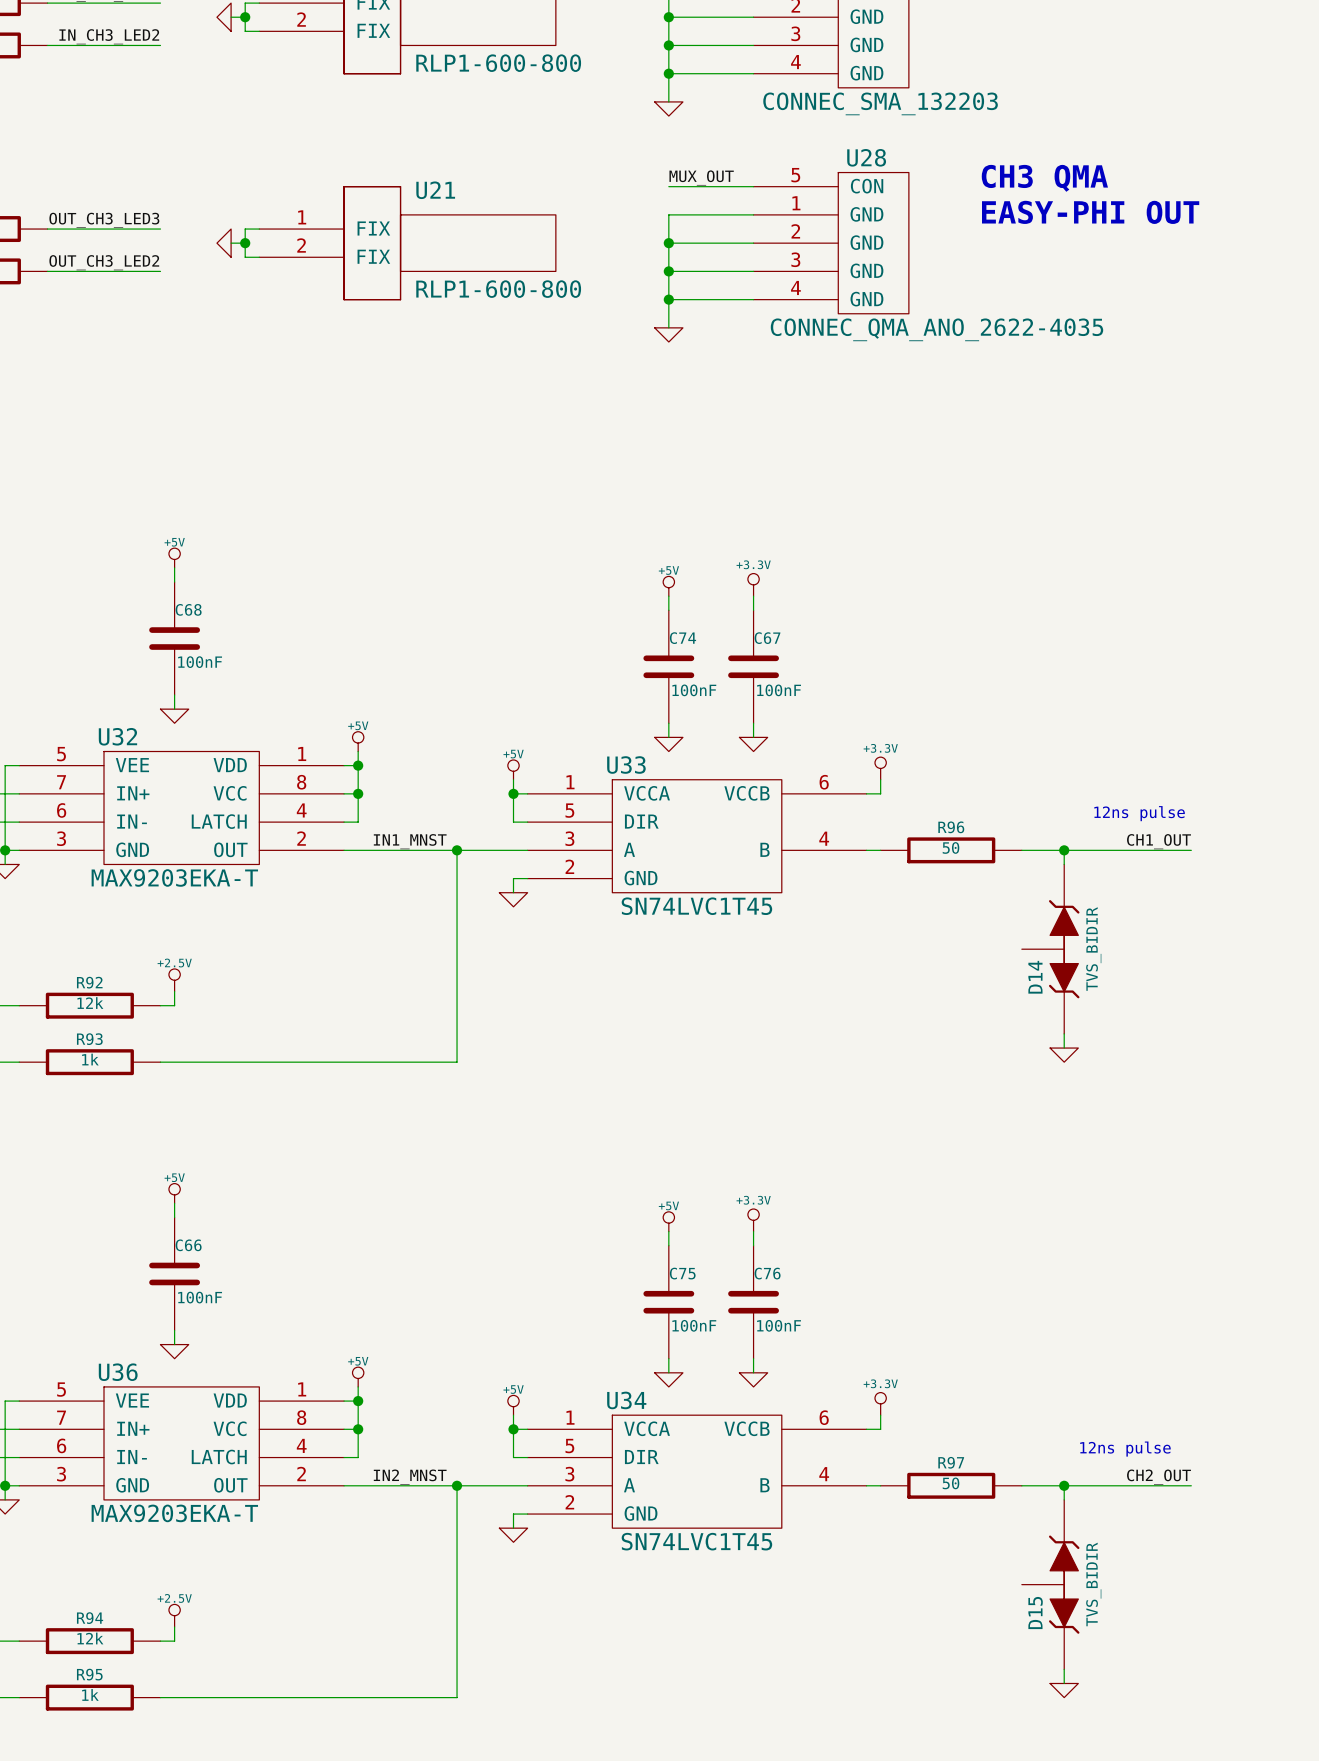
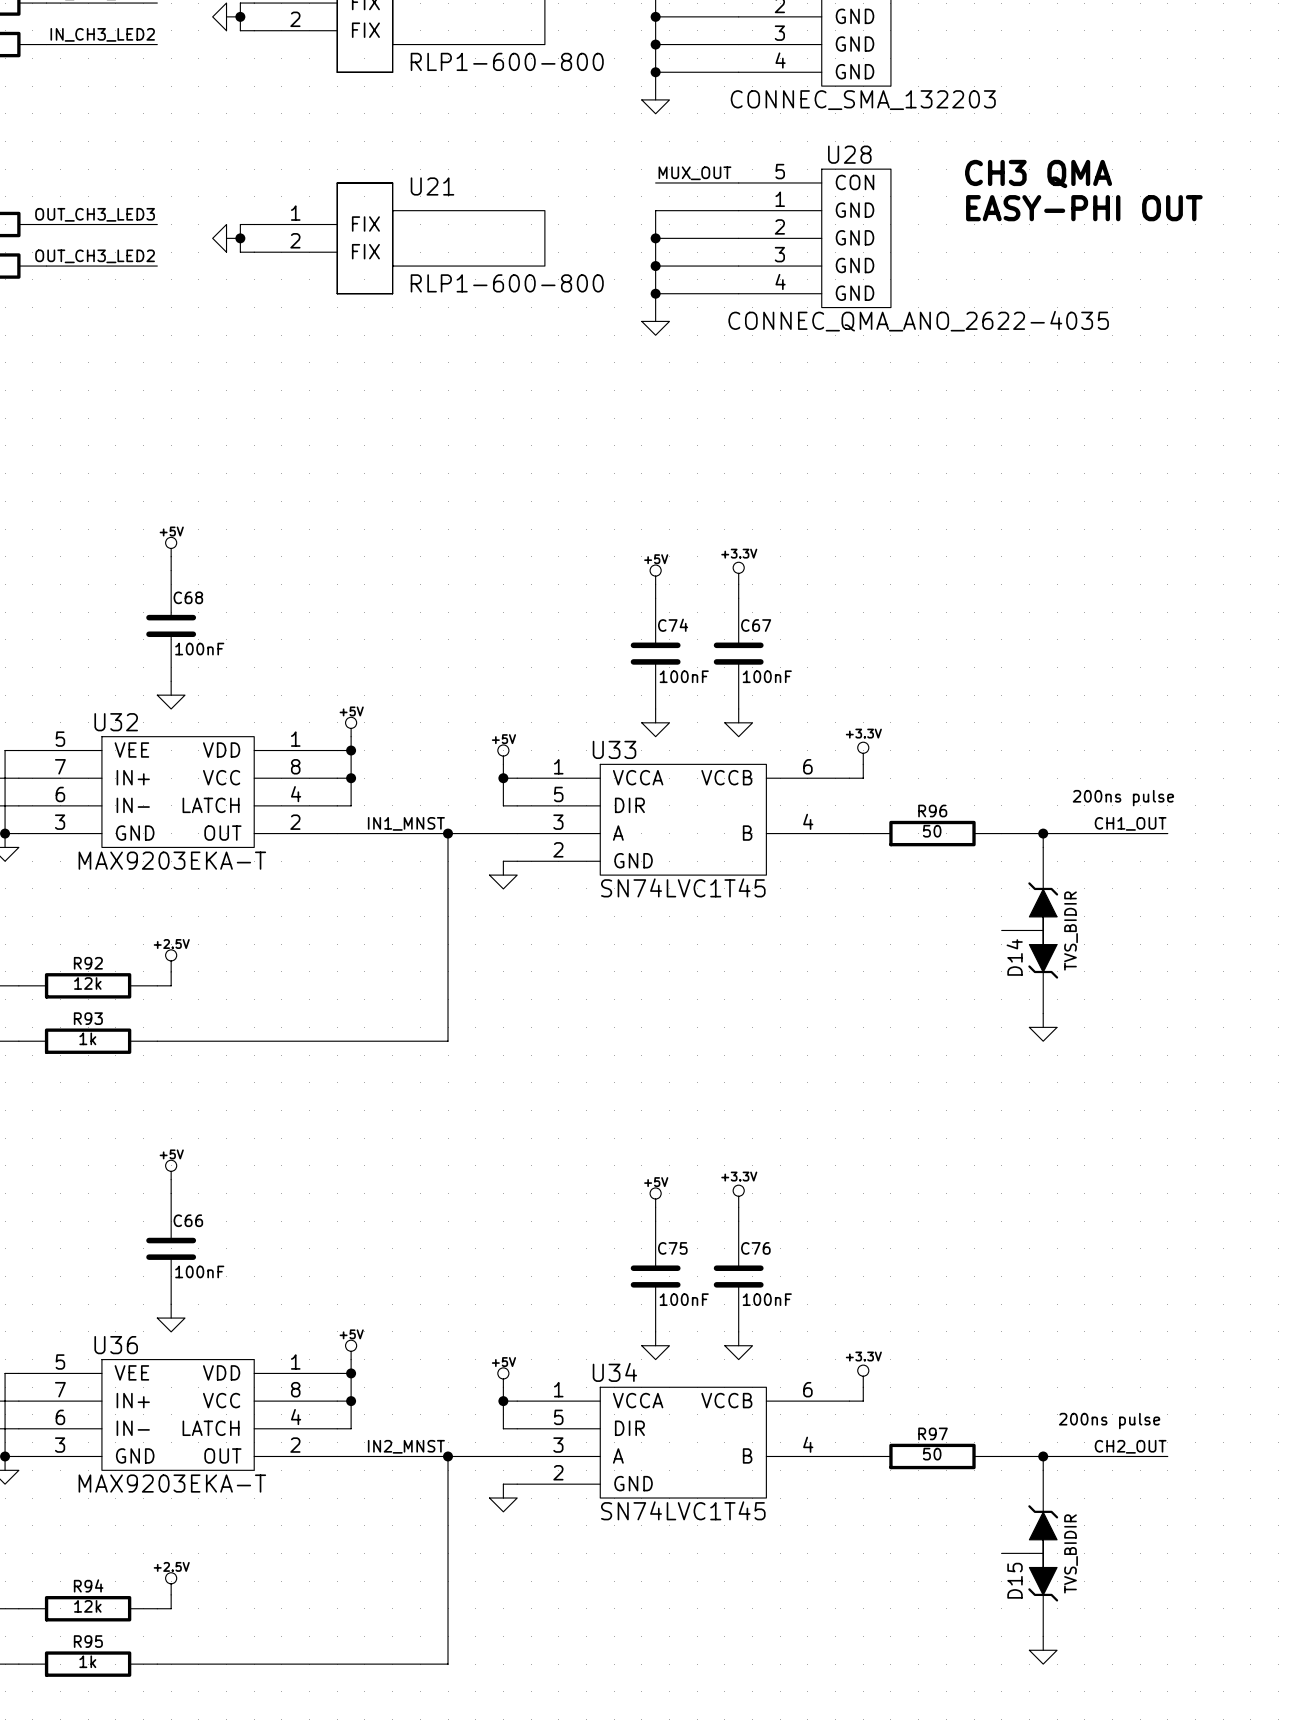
text: 12ns pulse (1139, 813) -> 200ns pulse (1123, 798)
text: 12ns pulse (1125, 1449) -> 200ns pulse (1109, 1421)

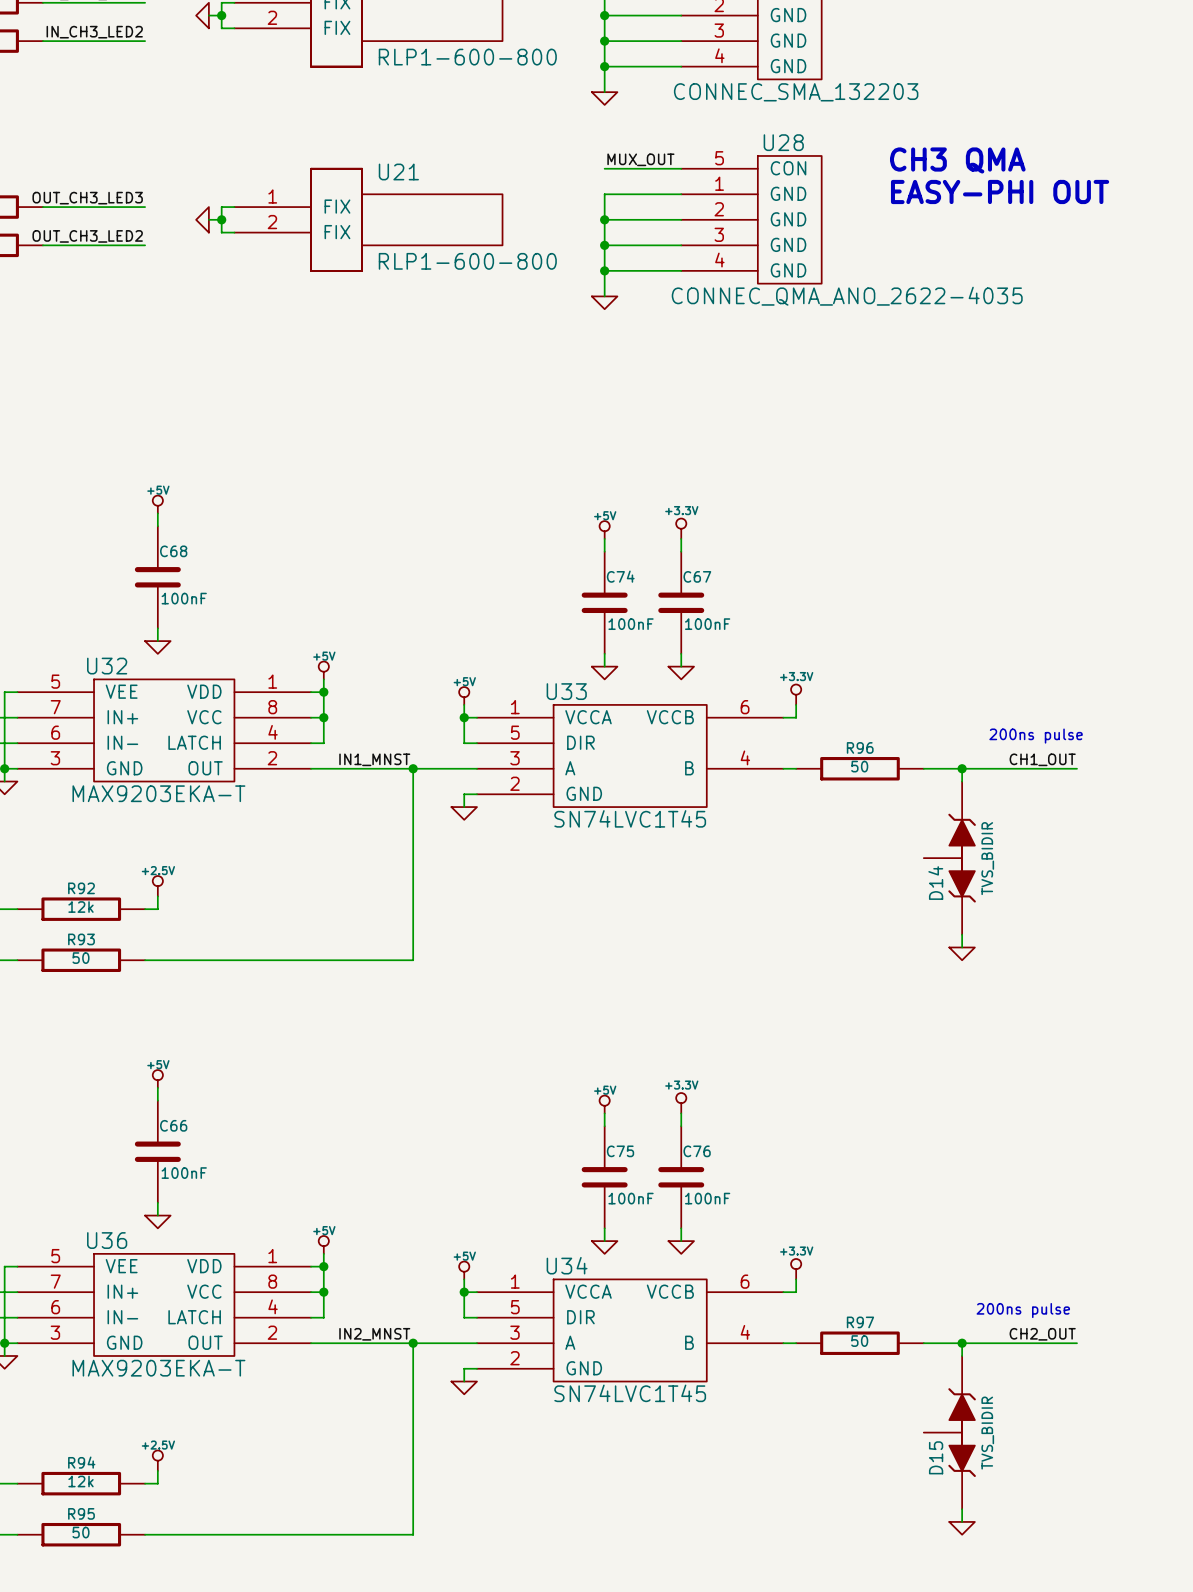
R93 value: 1k (87, 1038) -> 50 (80, 958)
R95 value: 1k (87, 1661) -> 50 (80, 1532)

